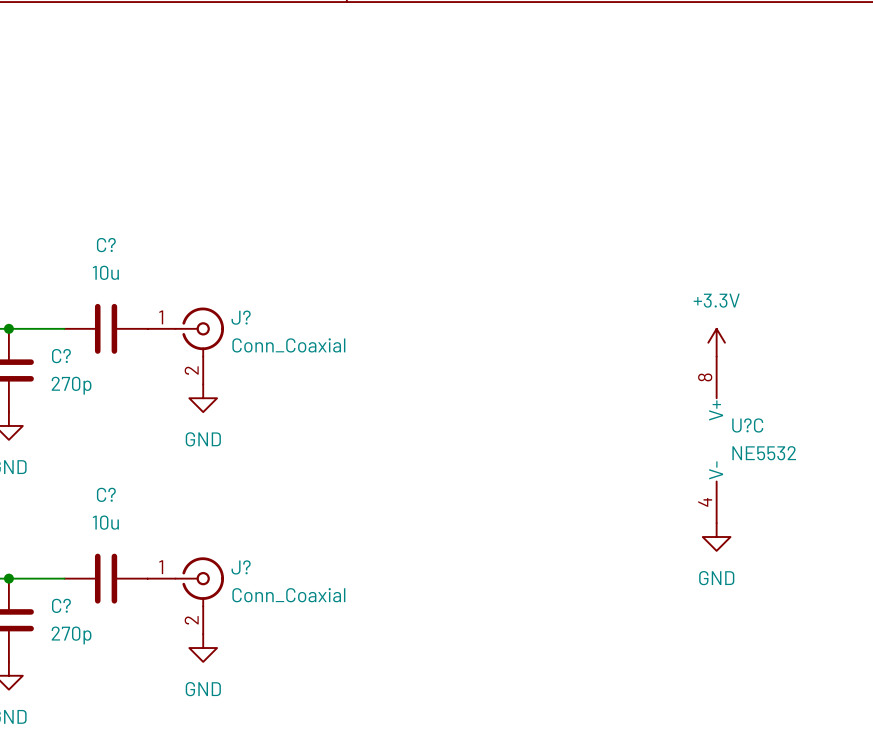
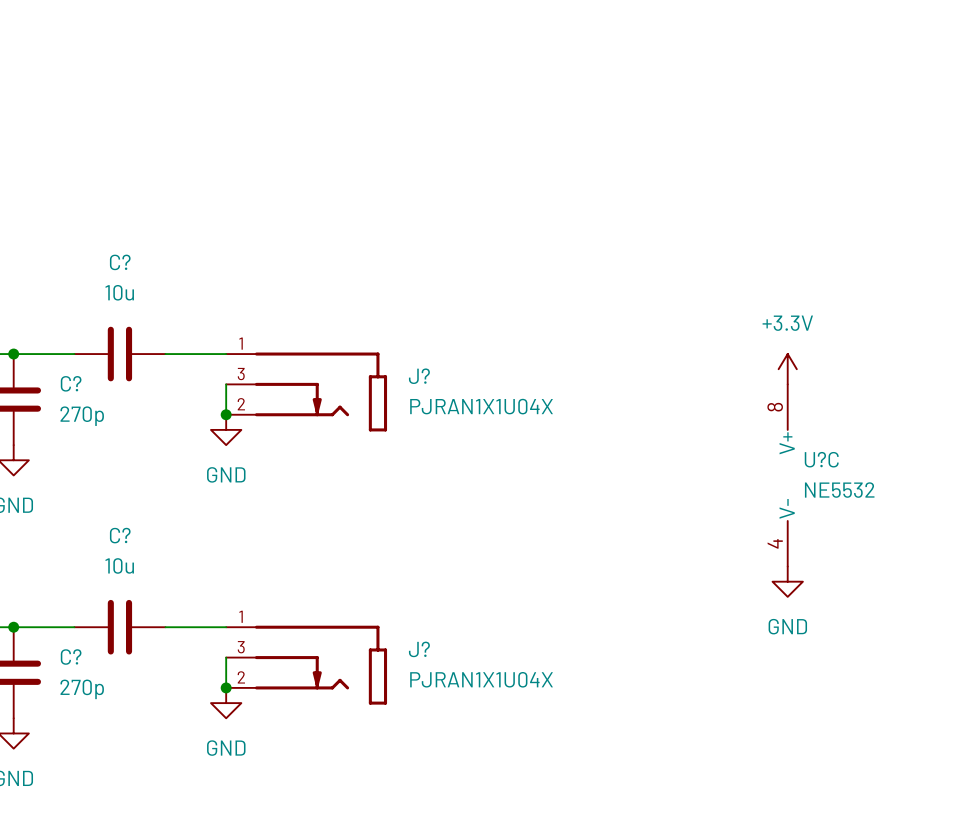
J?: Conn_Coaxial (185, 345) -> none
J?: none -> PJRAN1X1U04X (306, 391)
junction: none -> (226, 414)
J?: Conn_Coaxial (185, 595) -> none
J?: none -> PJRAN1X1U04X (306, 665)
junction: none -> (226, 687)

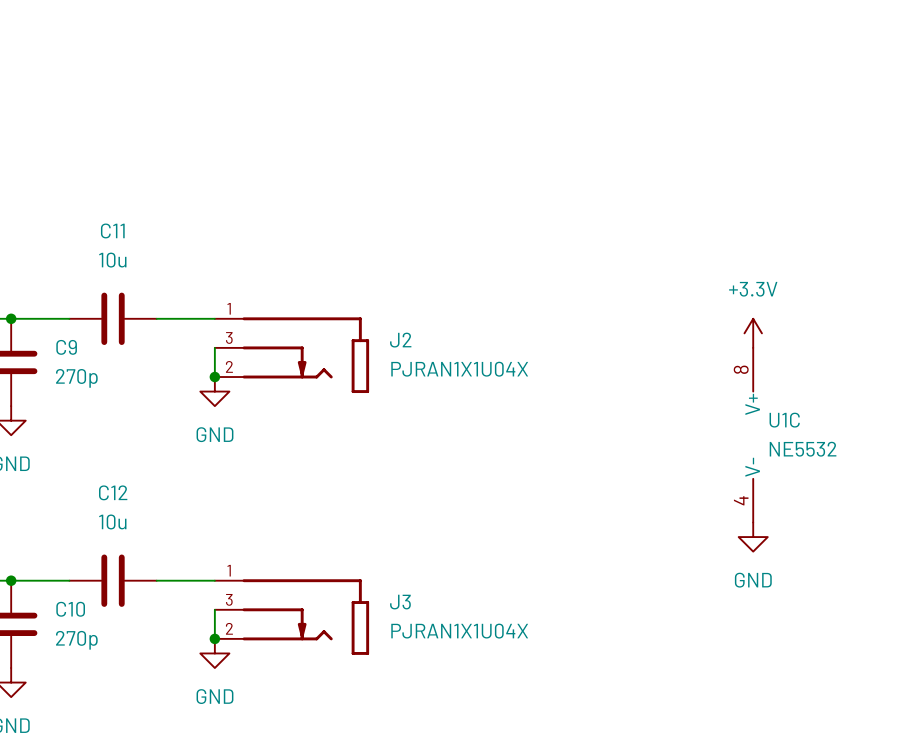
C? name: C? (120, 262) -> C11 (112, 230)
J? name: J? (419, 376) -> J2 (400, 340)
C? name: C? (71, 383) -> C9 (66, 347)
U?C name: U?C (821, 459) -> U1C (784, 420)
C? name: C? (120, 535) -> C12 (113, 492)
J? name: J? (419, 649) -> J3 (400, 602)
C? name: C? (71, 657) -> C10 (70, 609)

